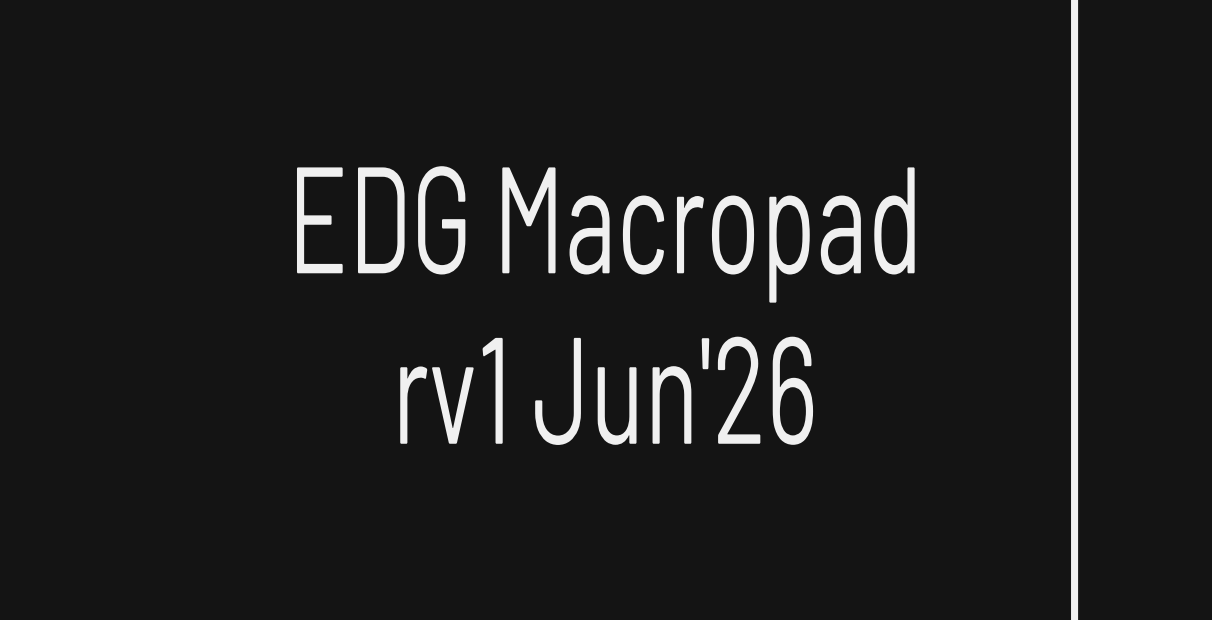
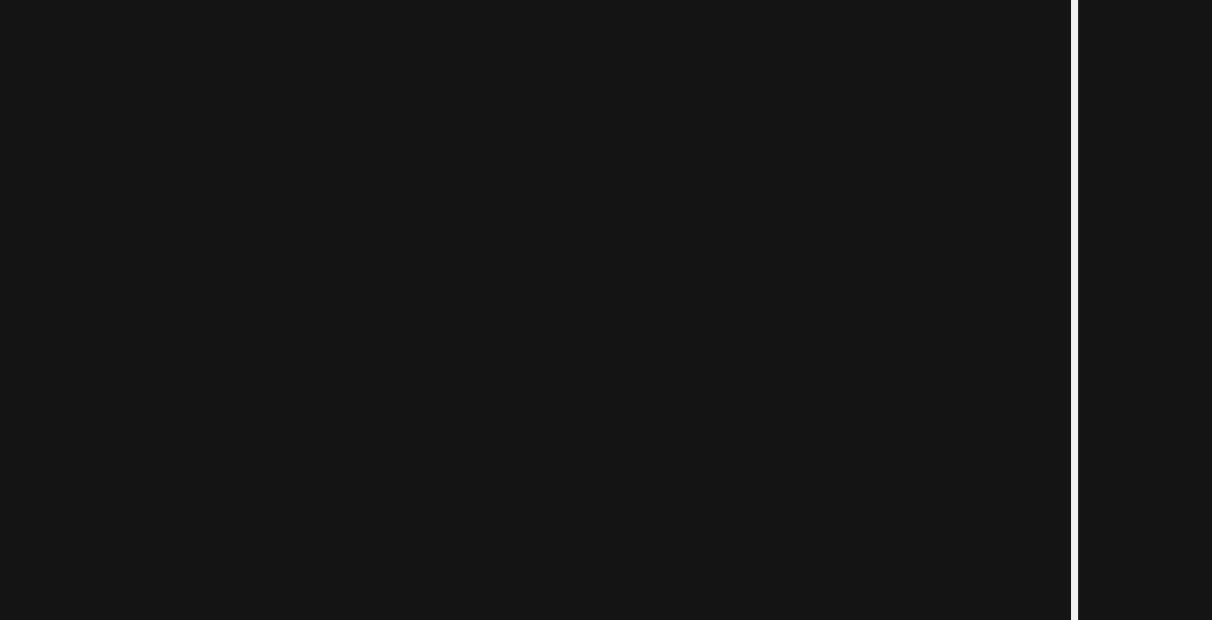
text: EDG Macropad (605, 234) -> none
text: rv1 Jun'26 (606, 390) -> none

